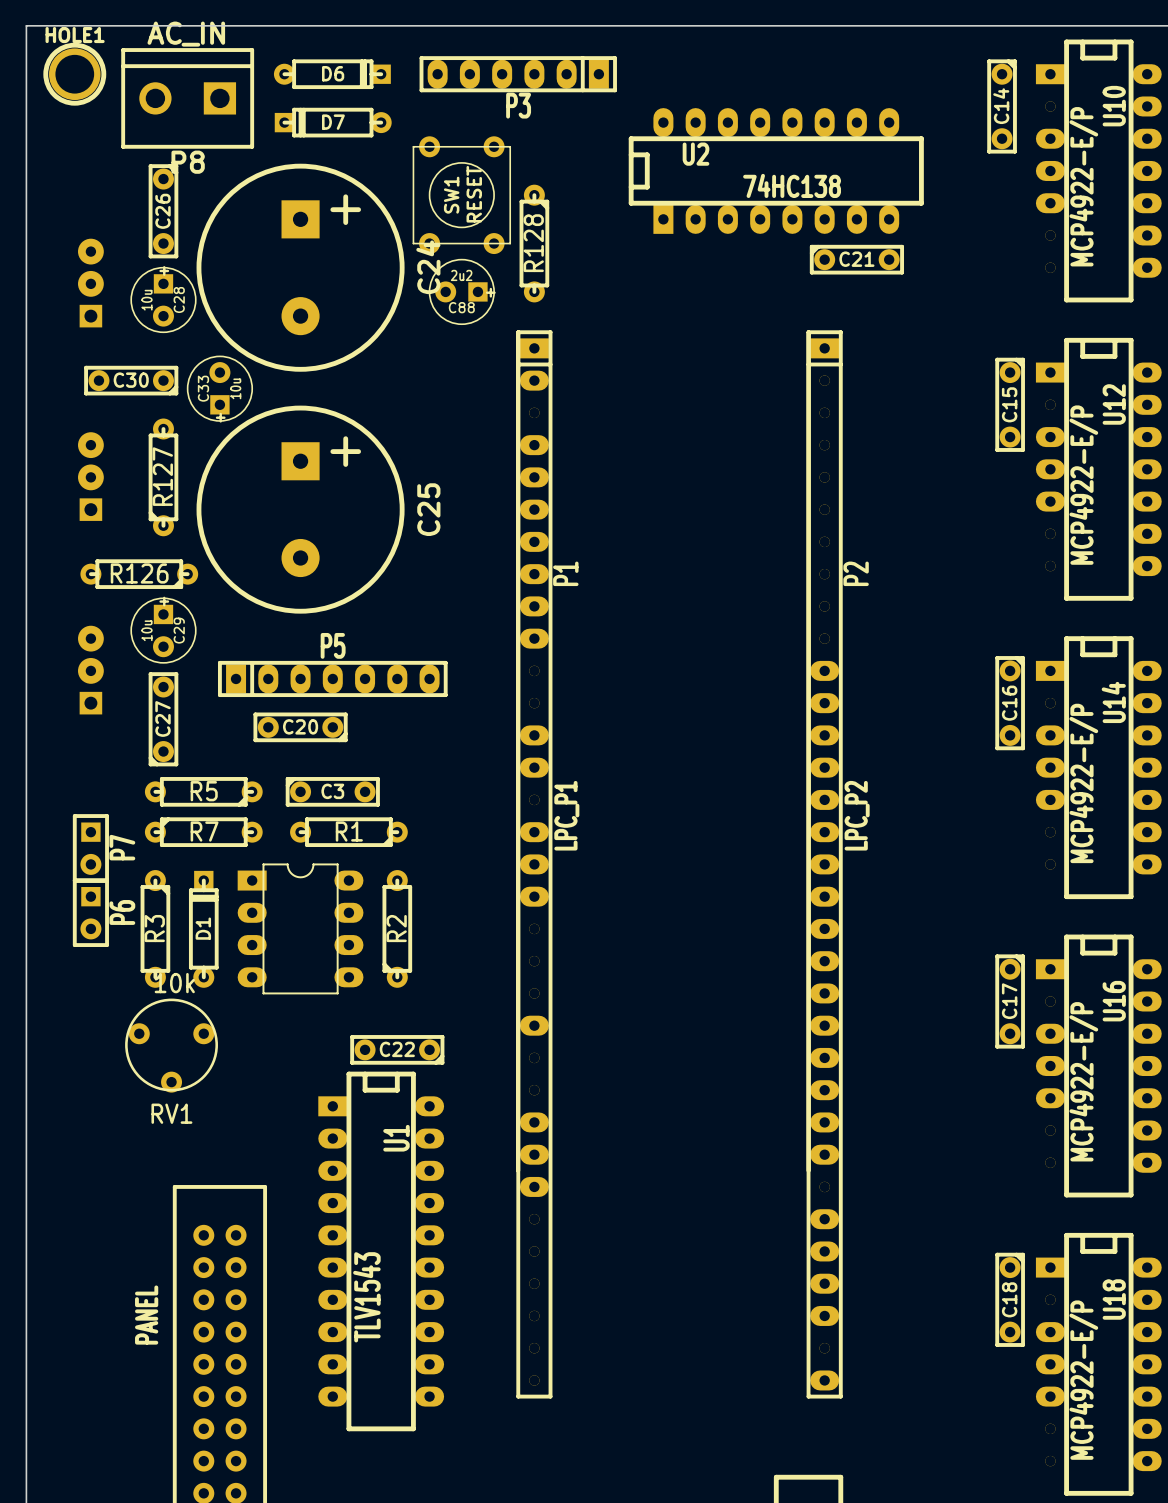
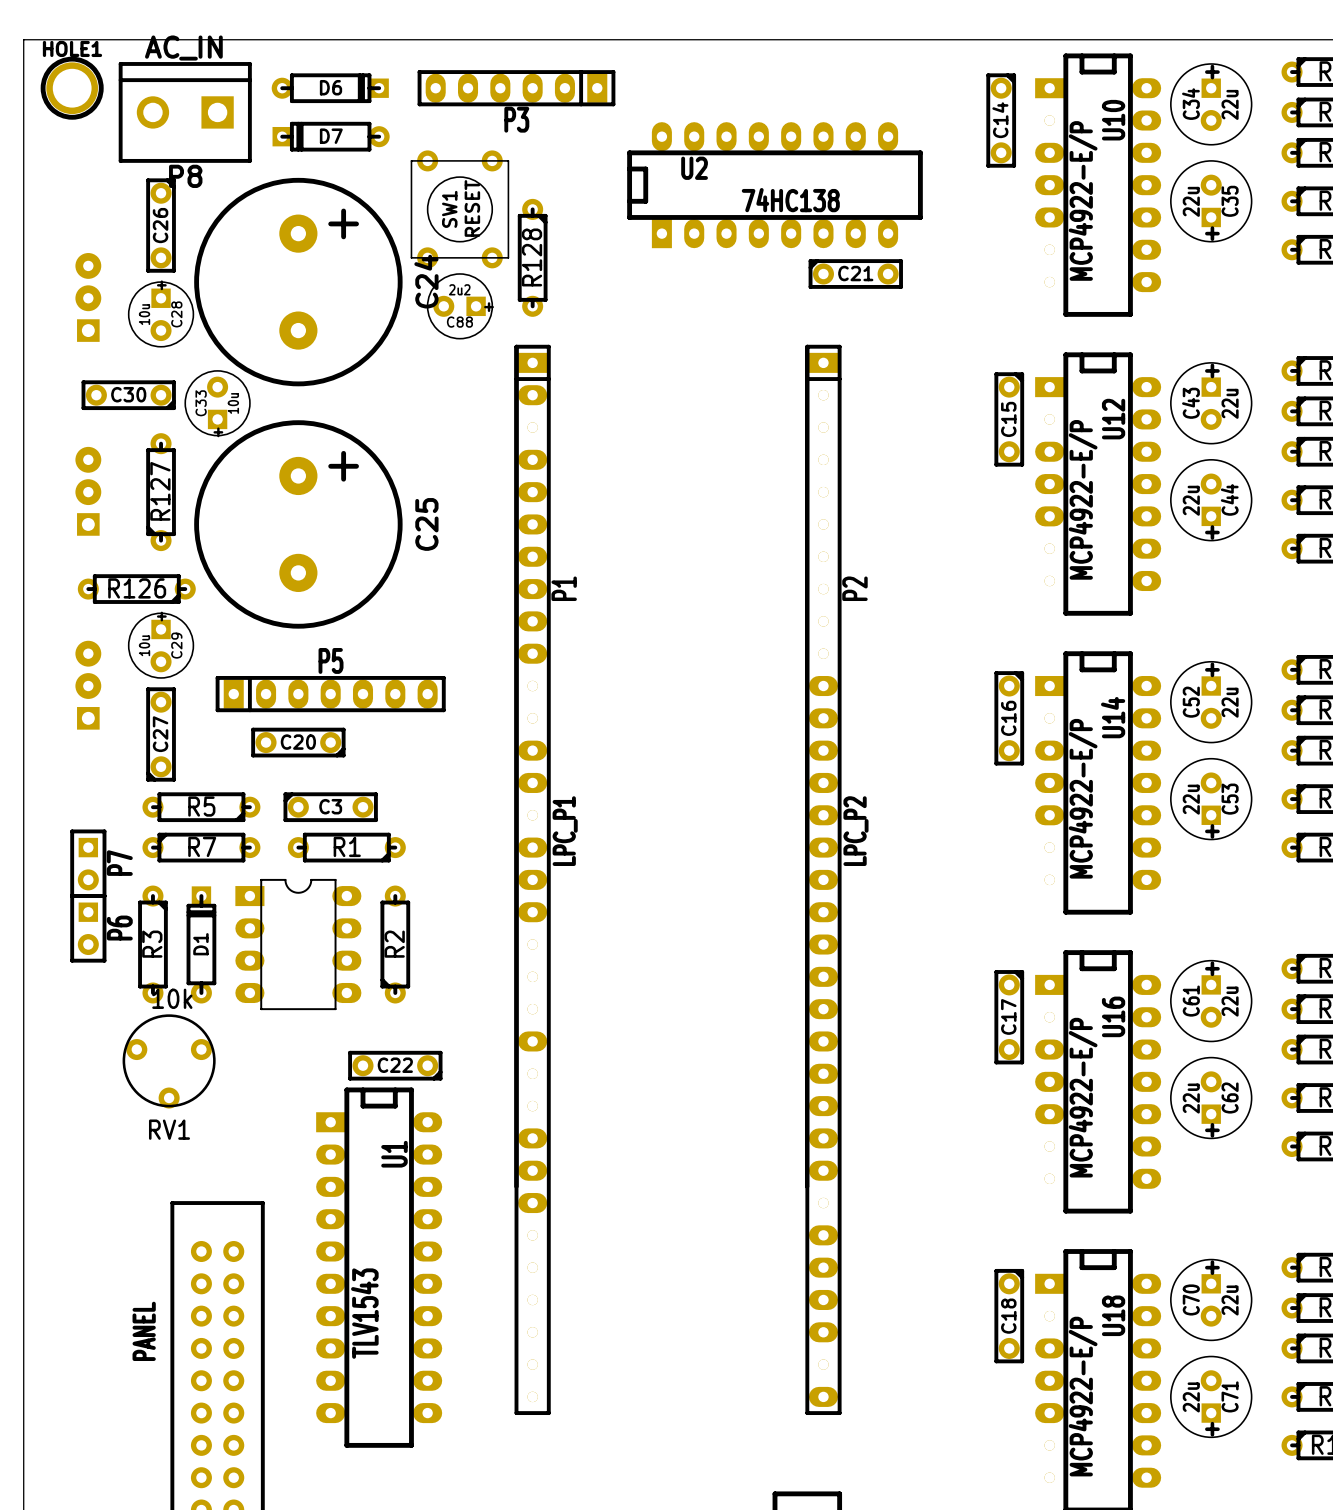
C24 footprint: [196, 163, 405, 372] -> [194, 177, 403, 387]
C25 footprint: [196, 405, 405, 614] -> [194, 420, 403, 629]

